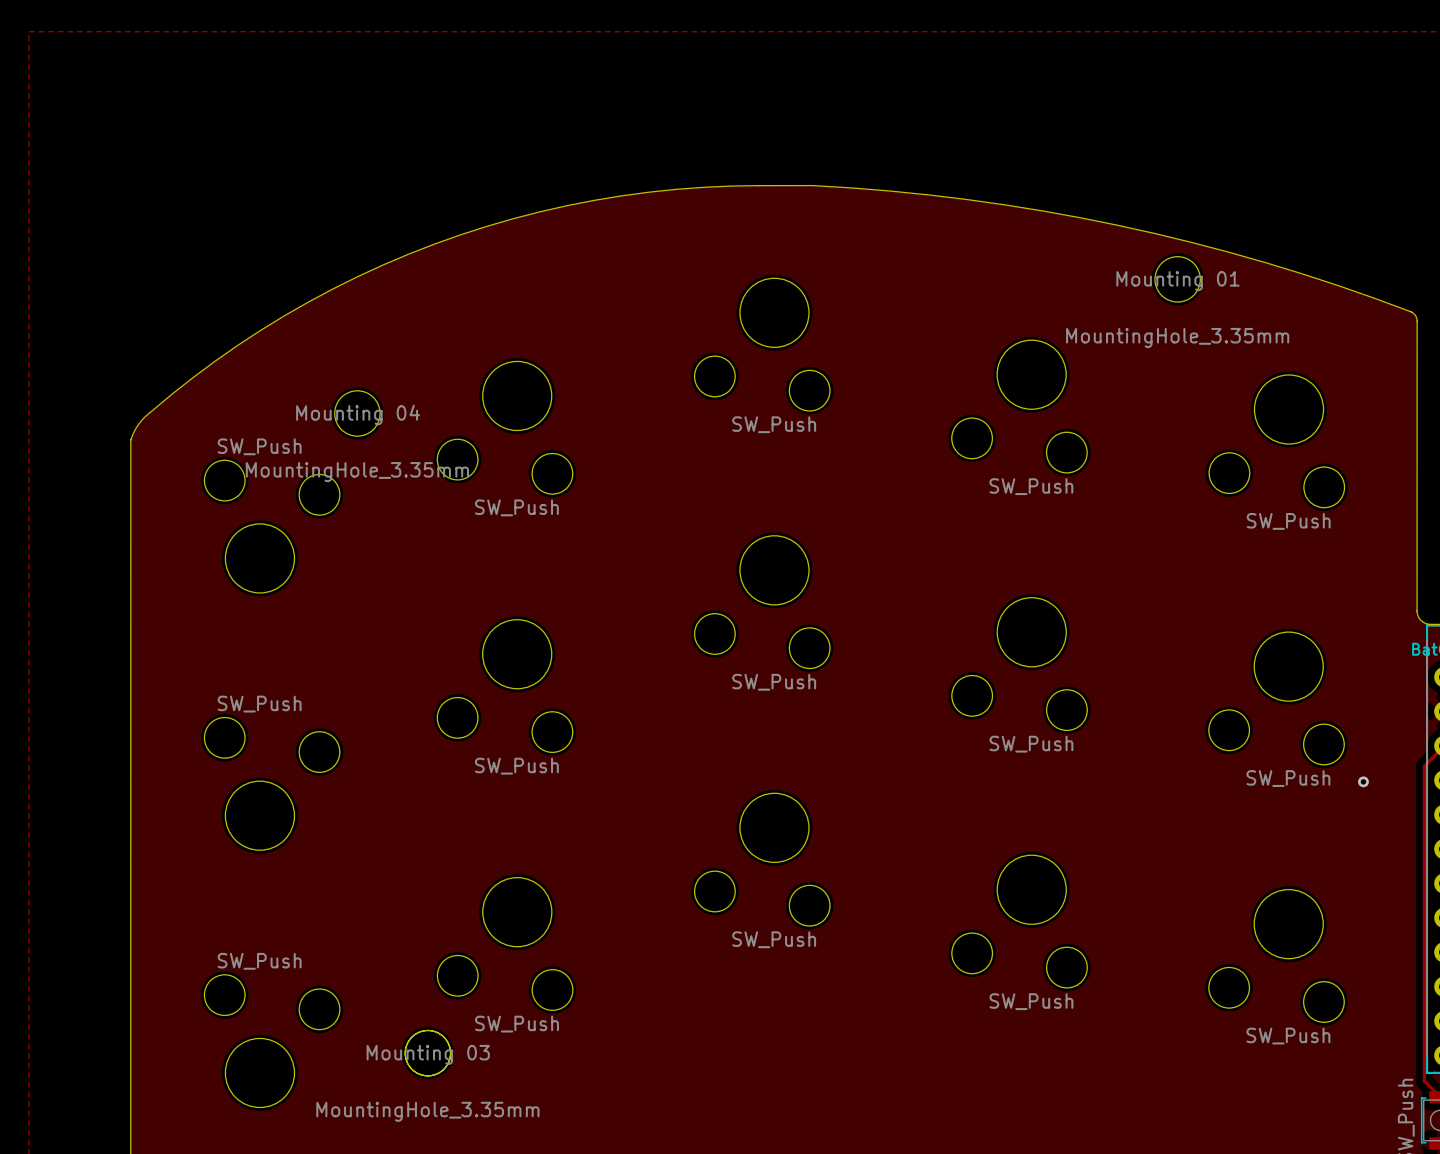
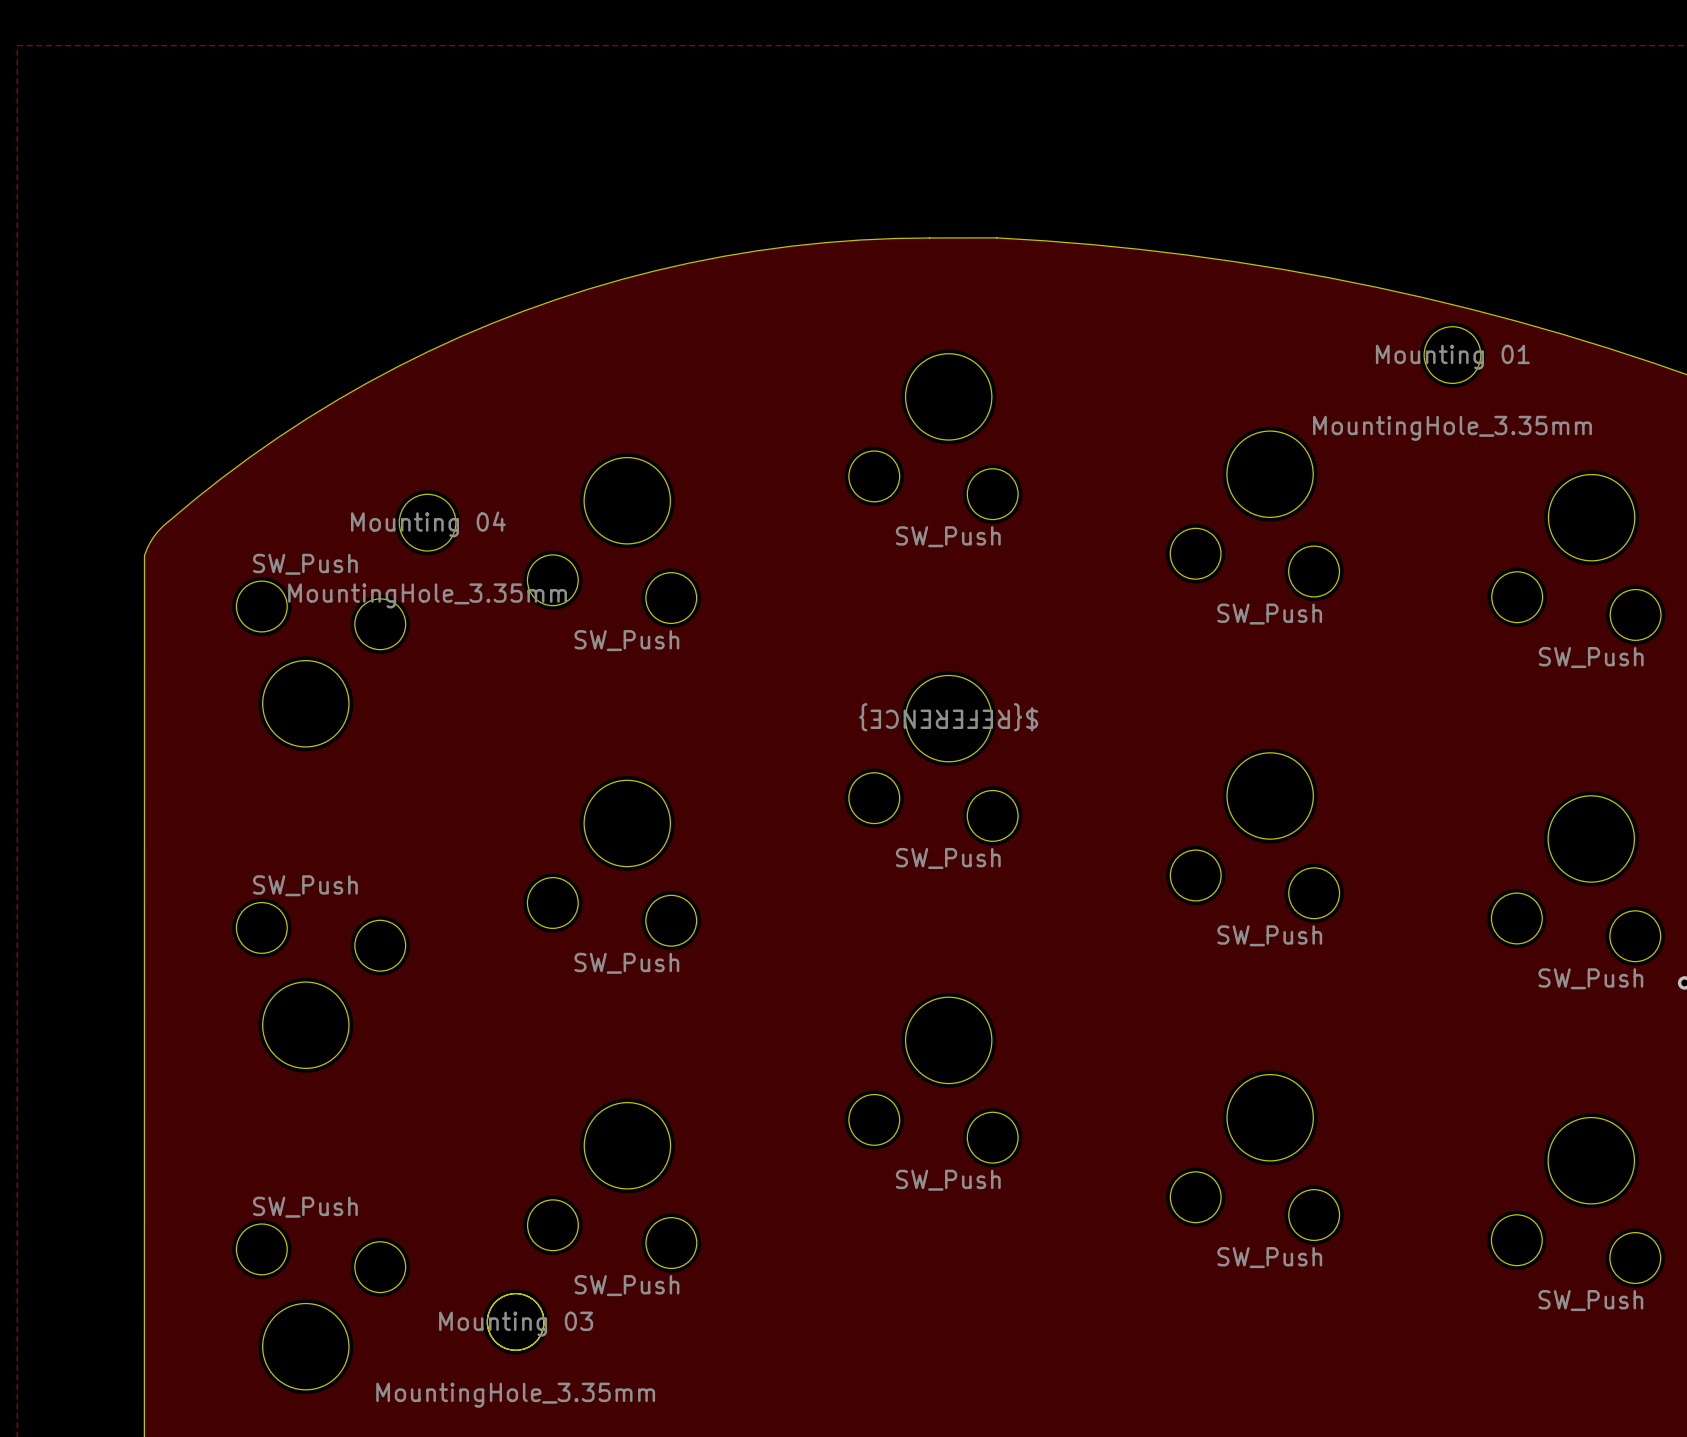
text: none -> ${REFERENCE} (948, 717)

